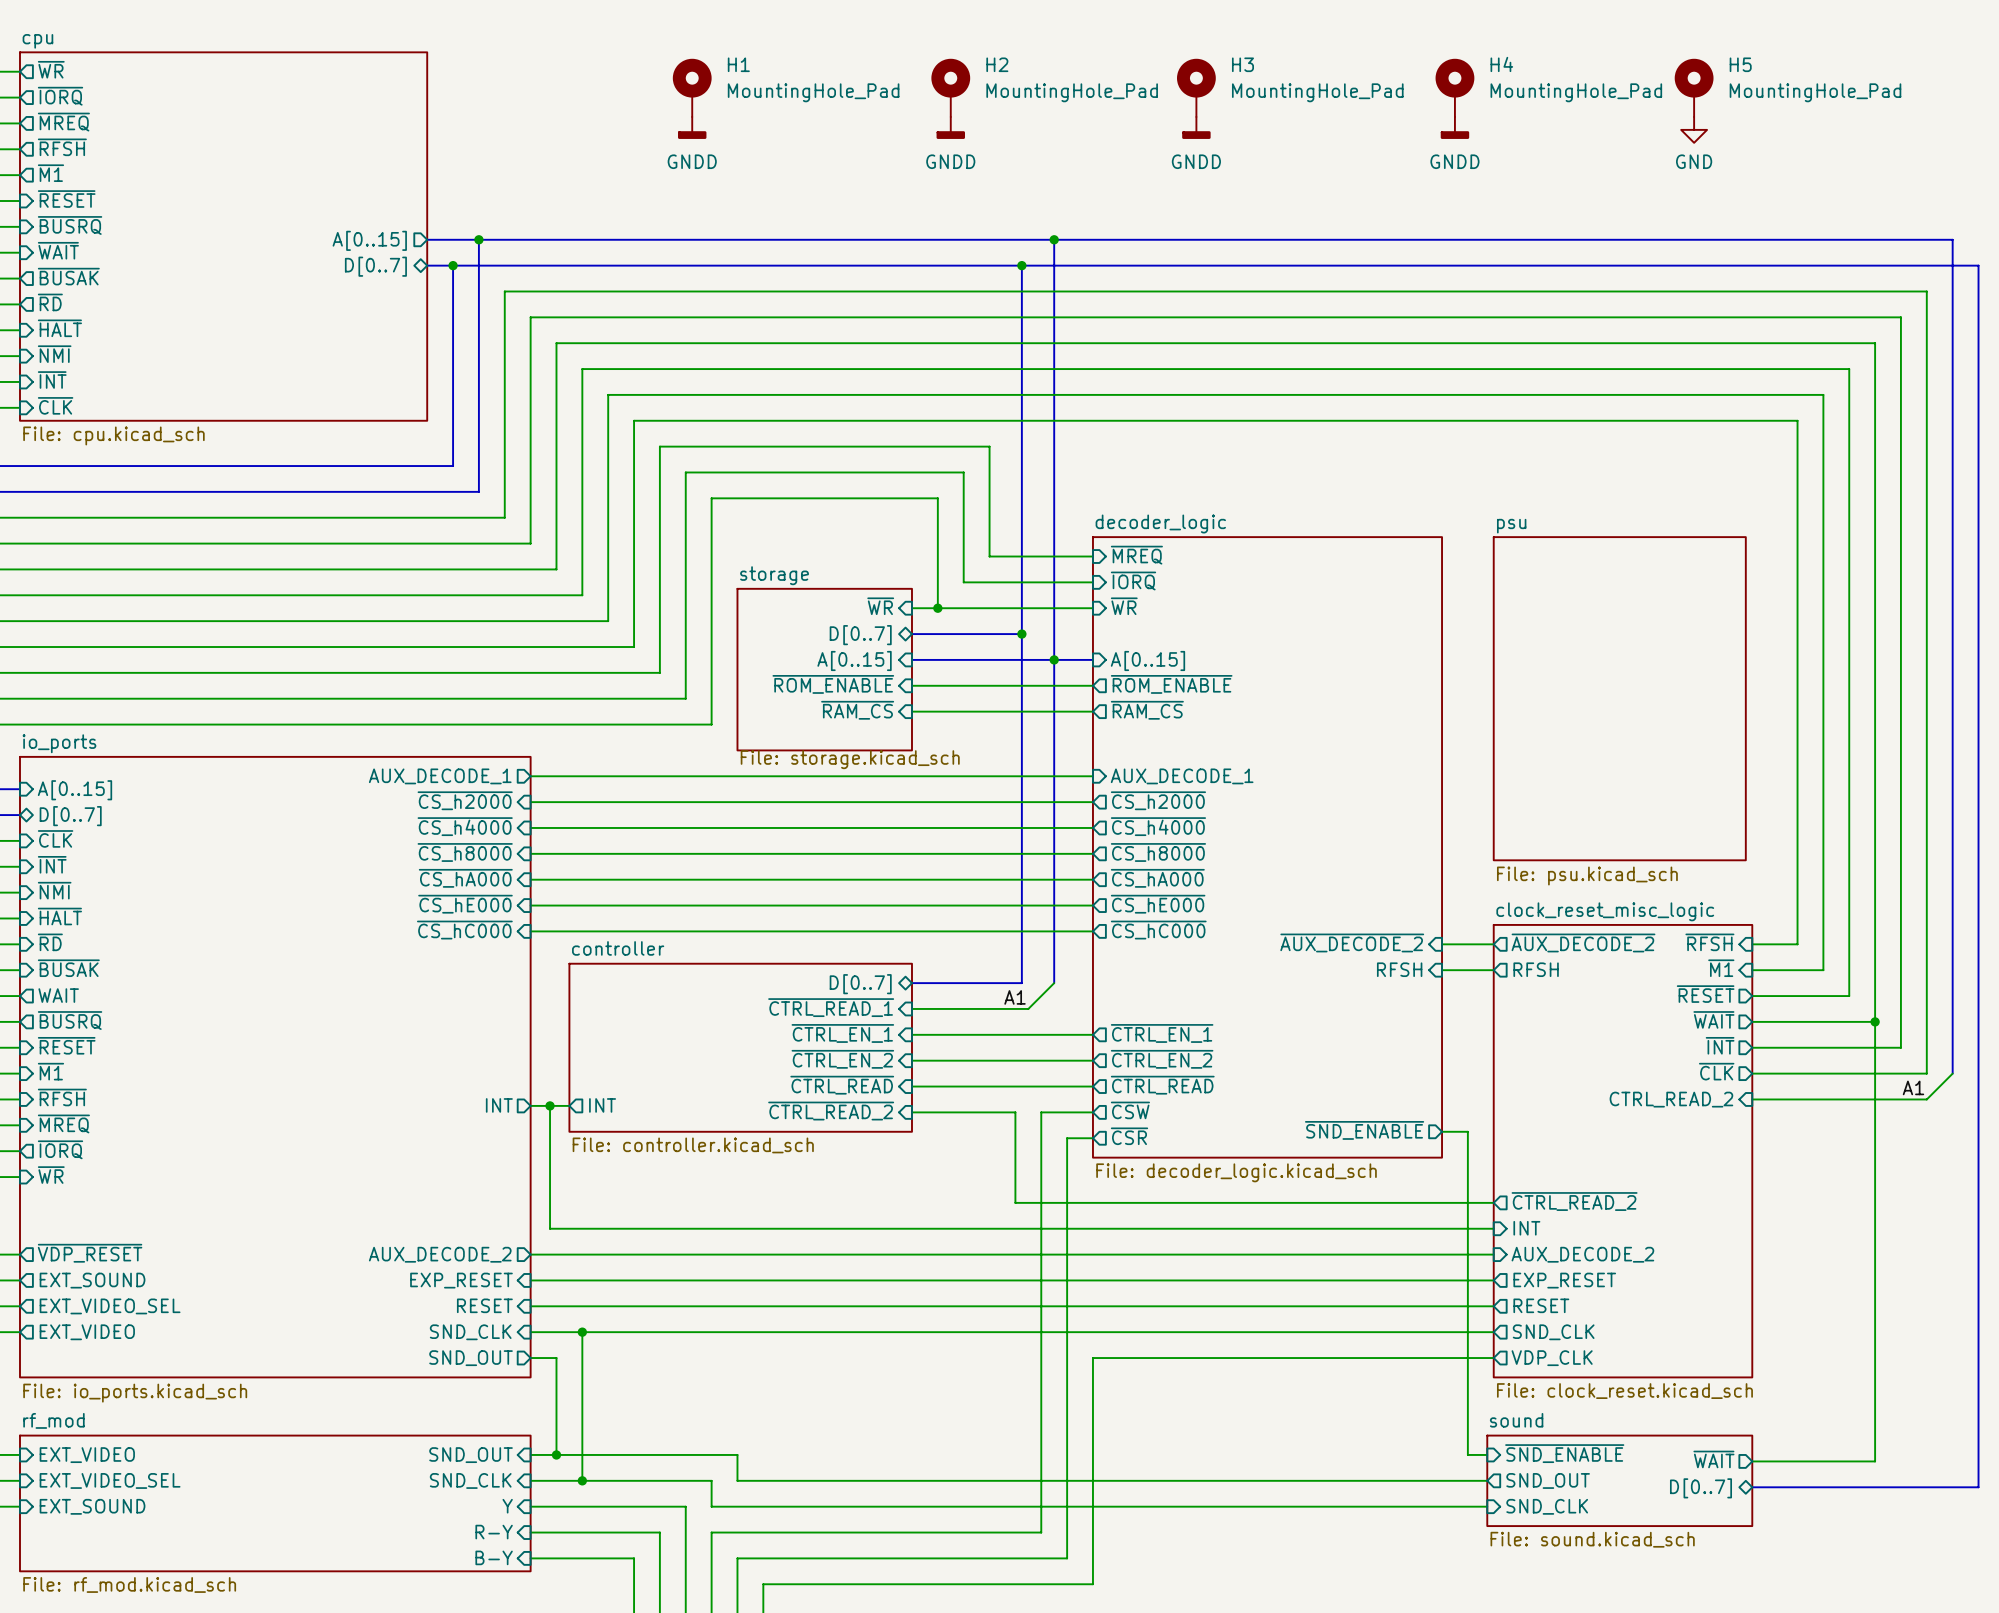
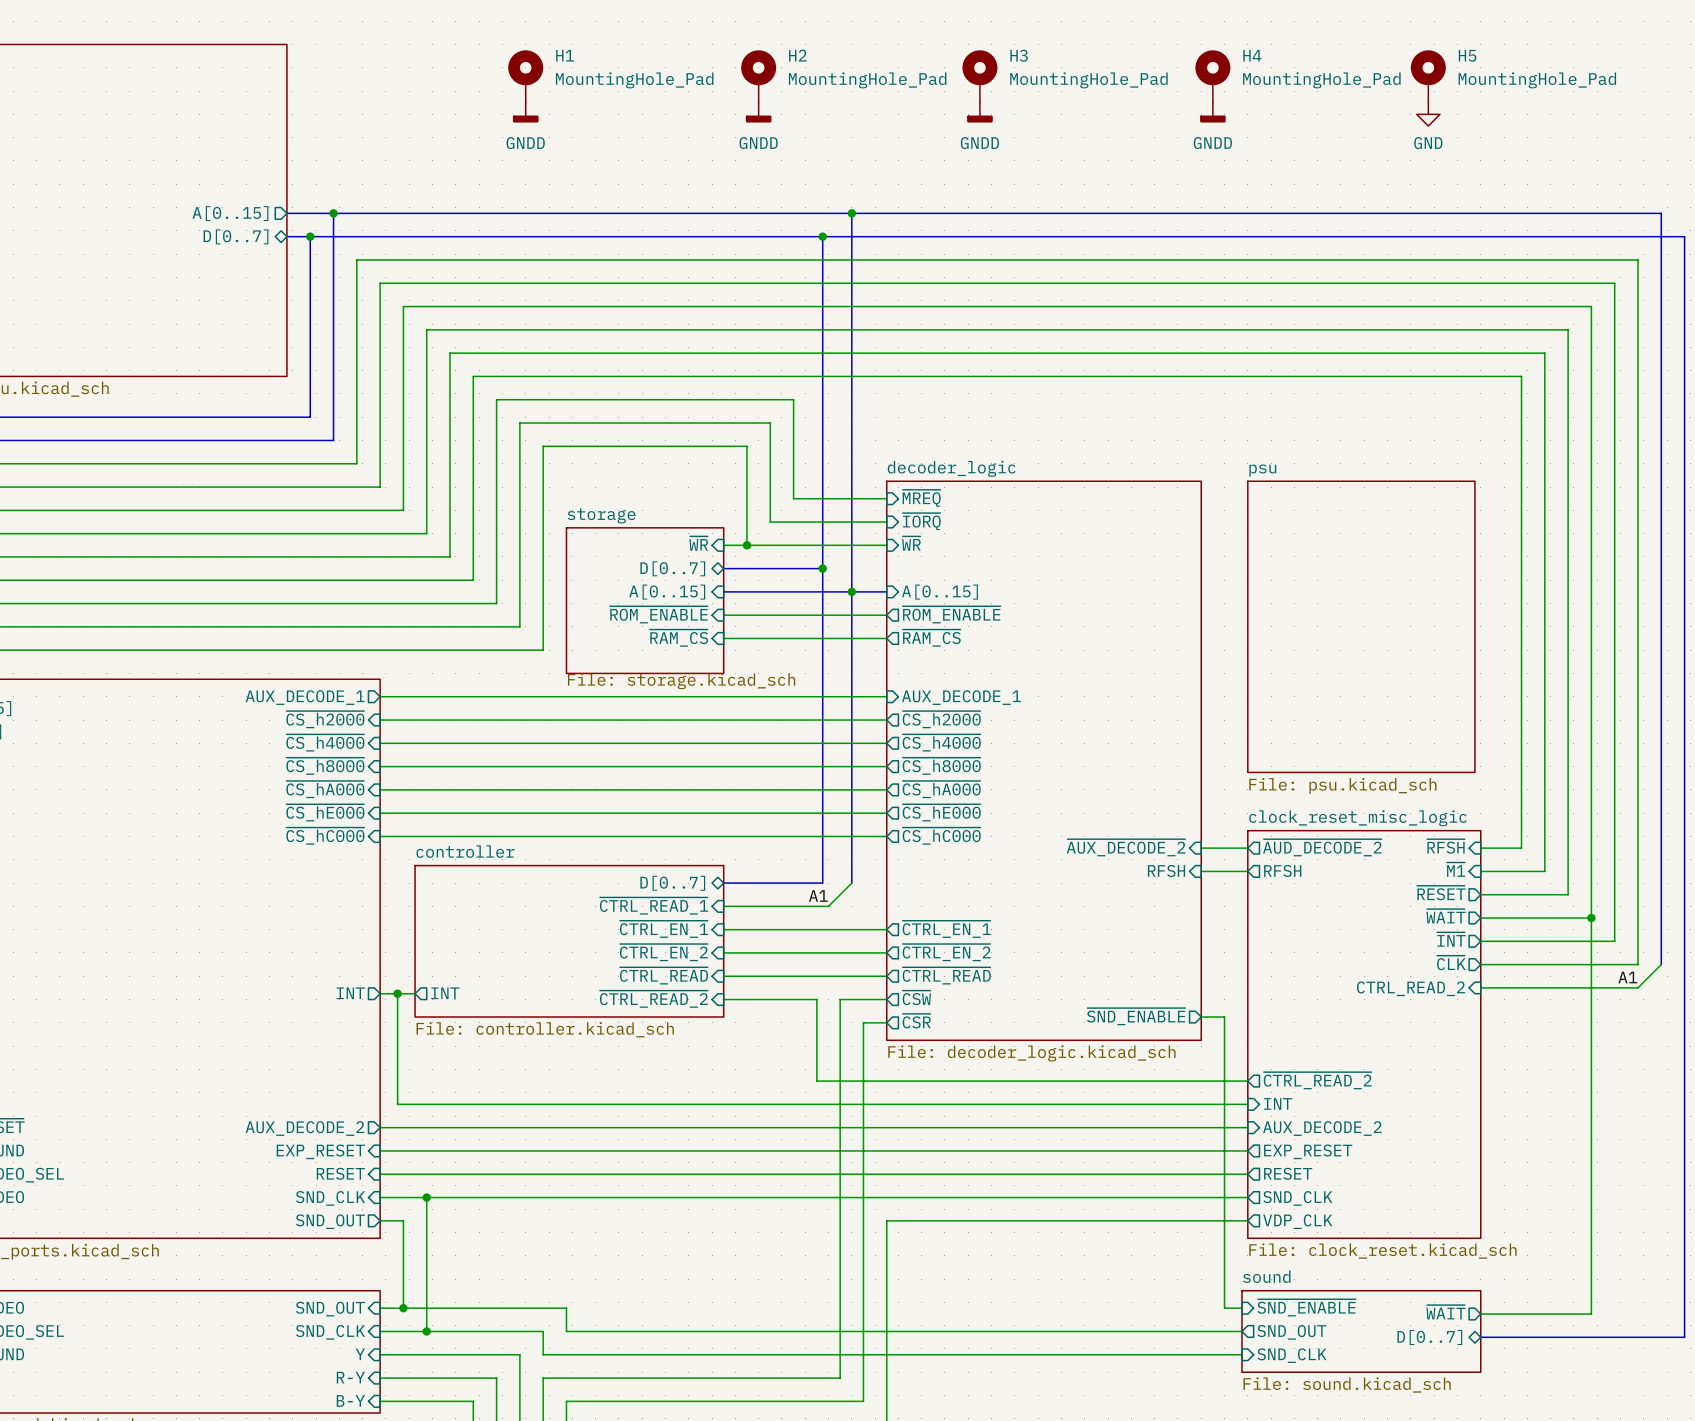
sheet pin: ~{AUX_DECODE_2} (1583, 942) -> ~{AUD_DECODE_2} (1322, 847)

